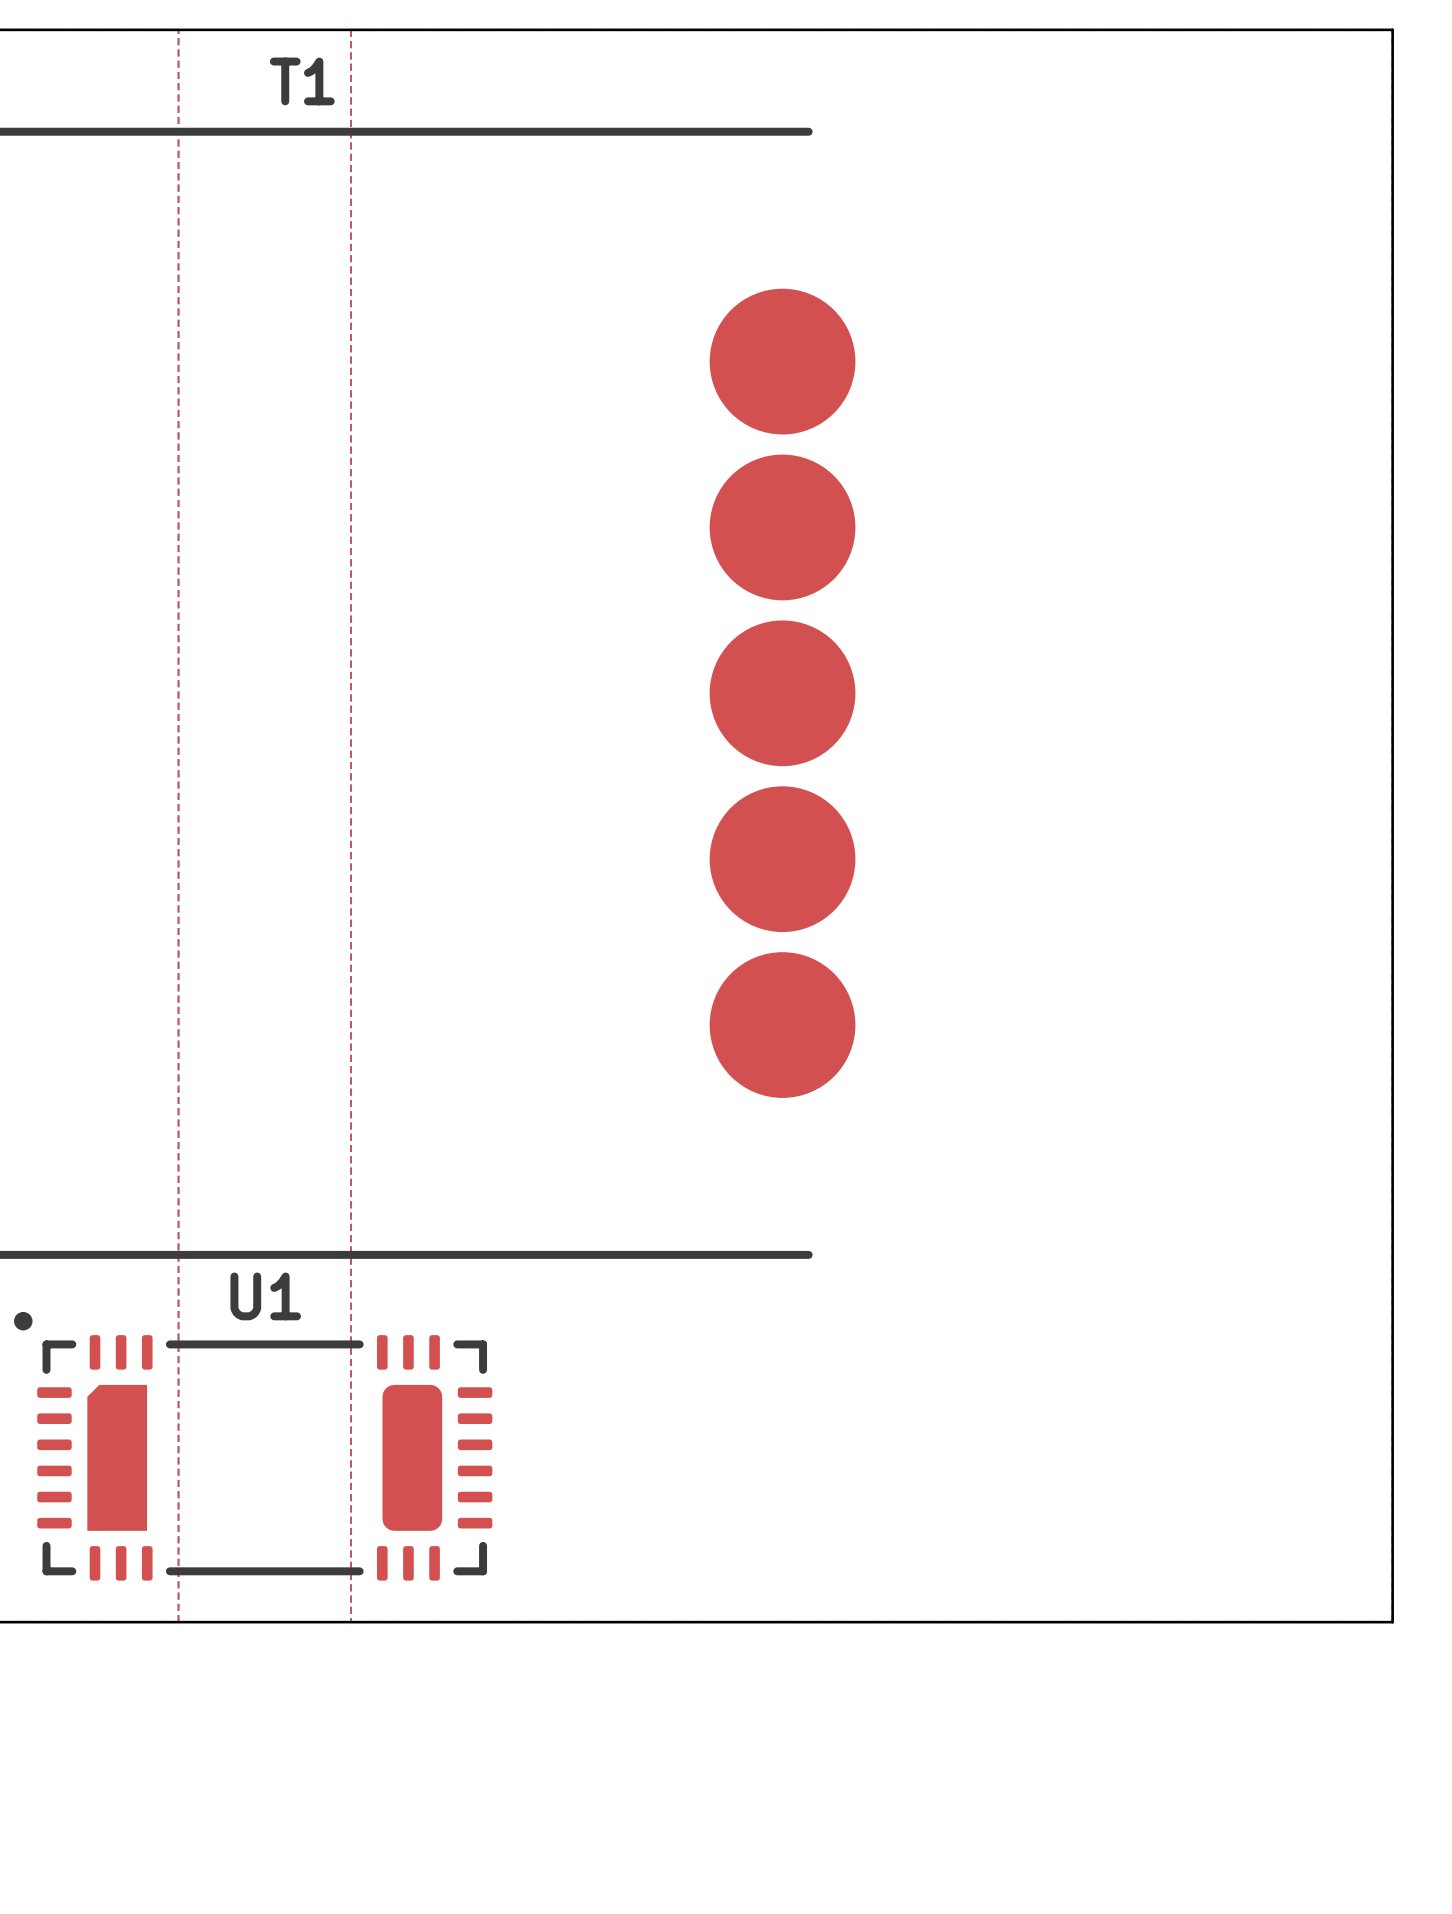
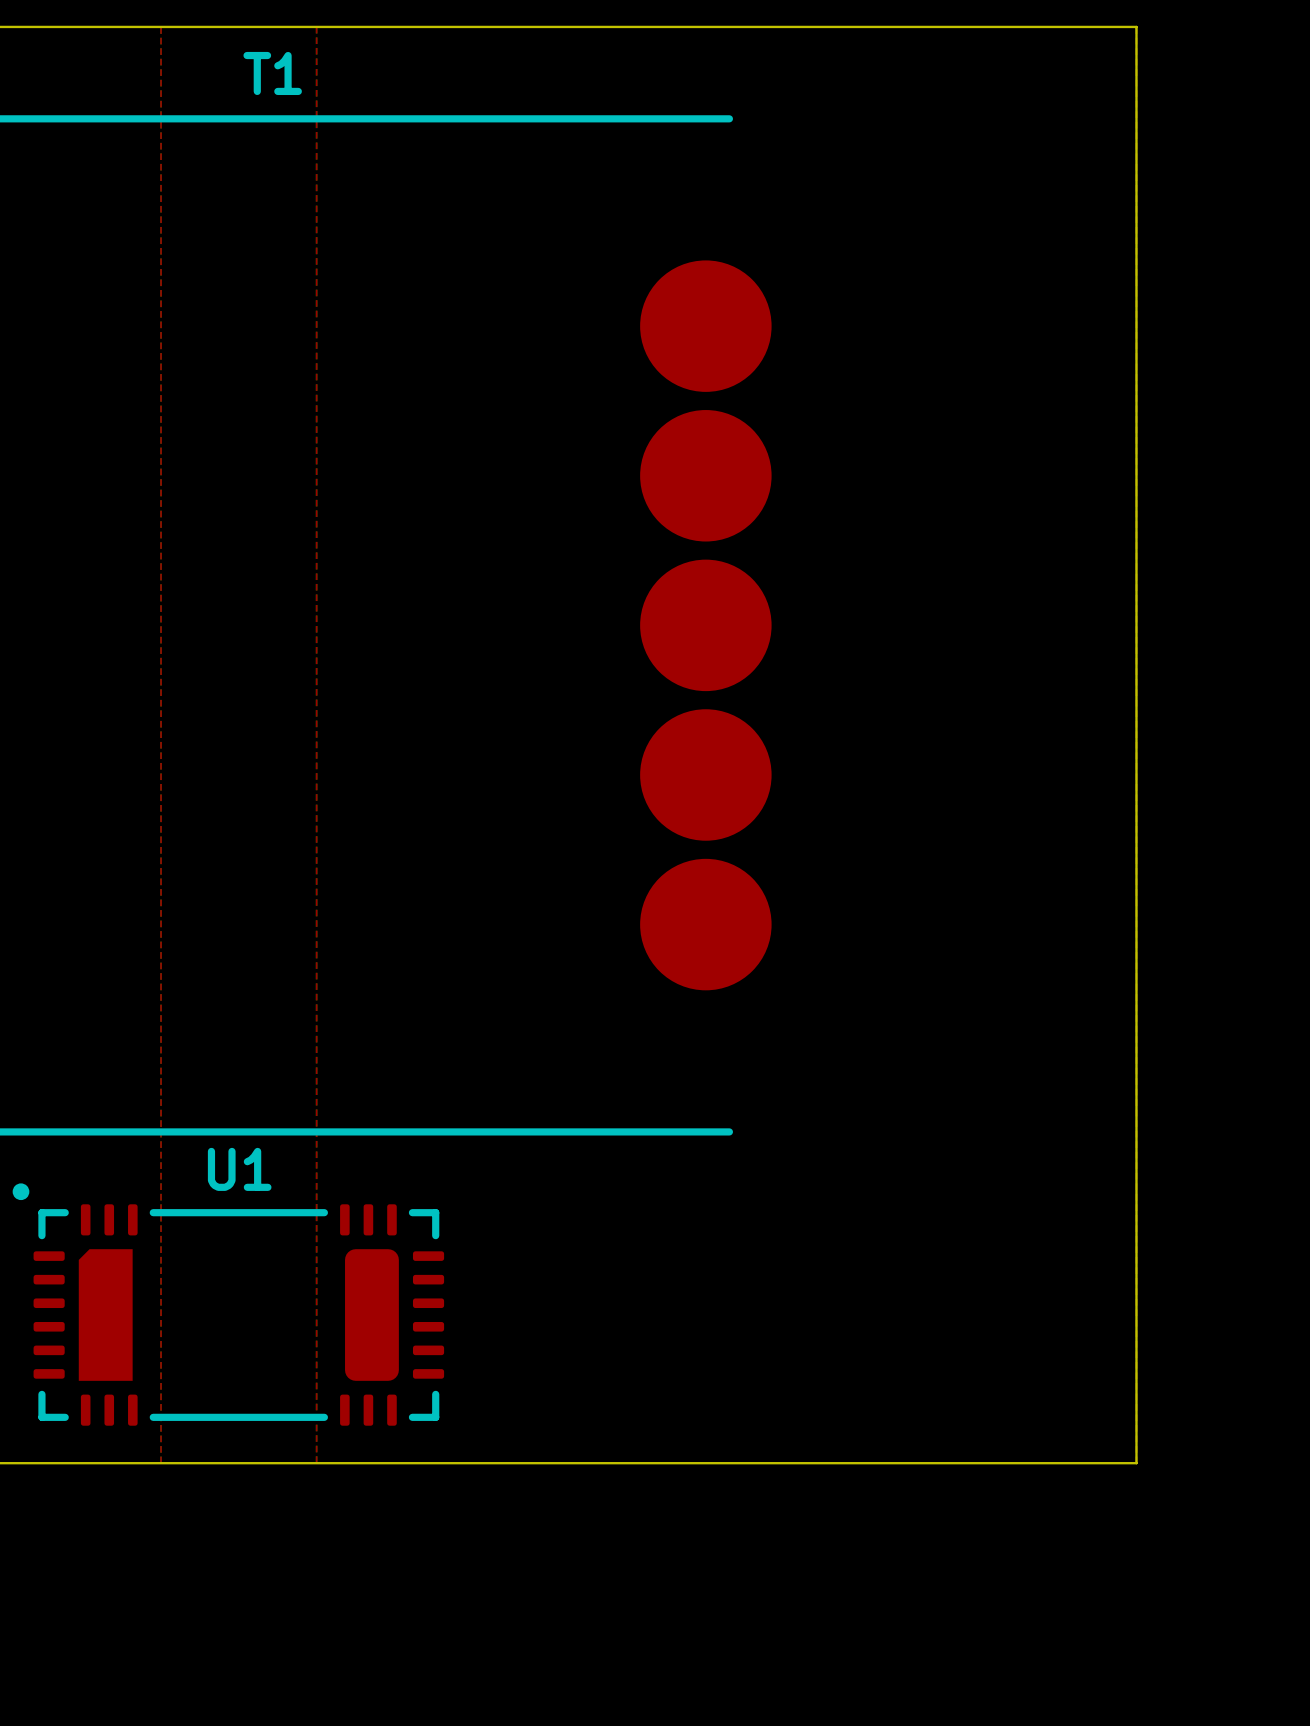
board edge: (1259, 29) (1392, 29) (1392, 1622) (1259, 1622) -> (1136, 26) (1136, 1463)

